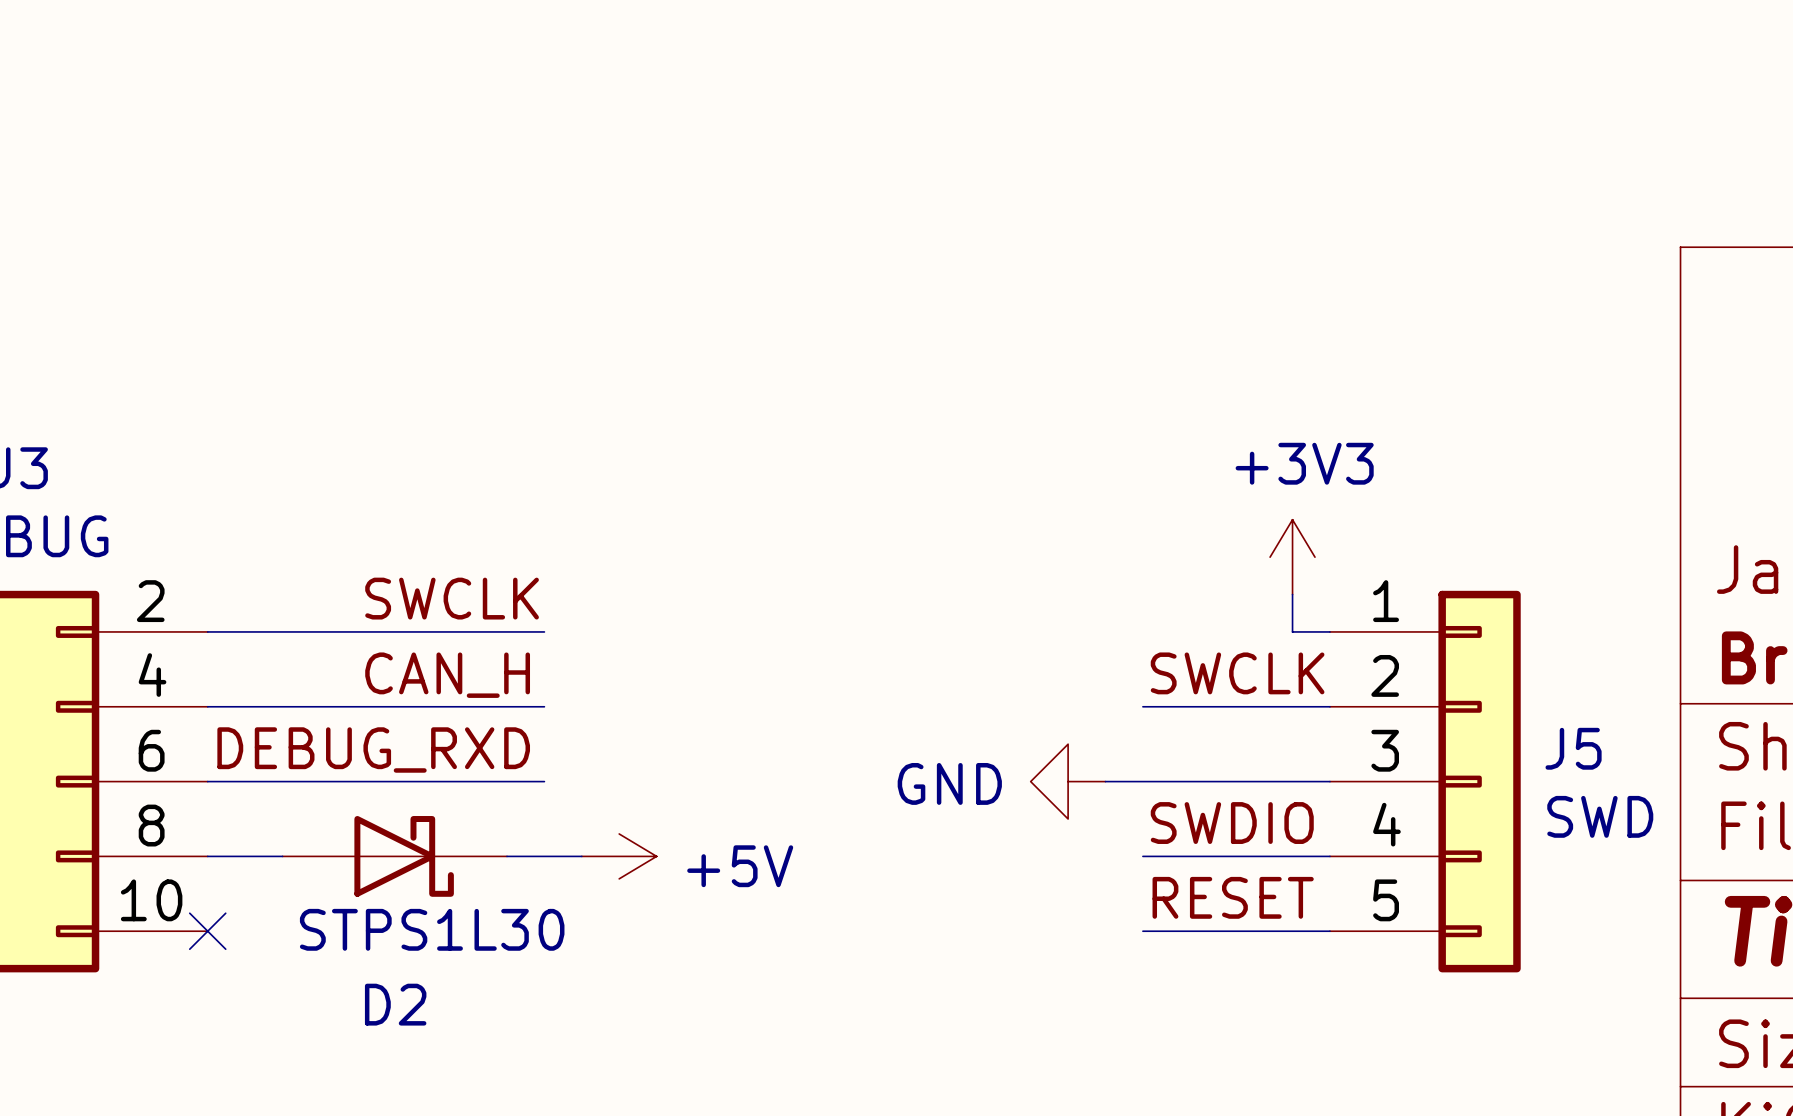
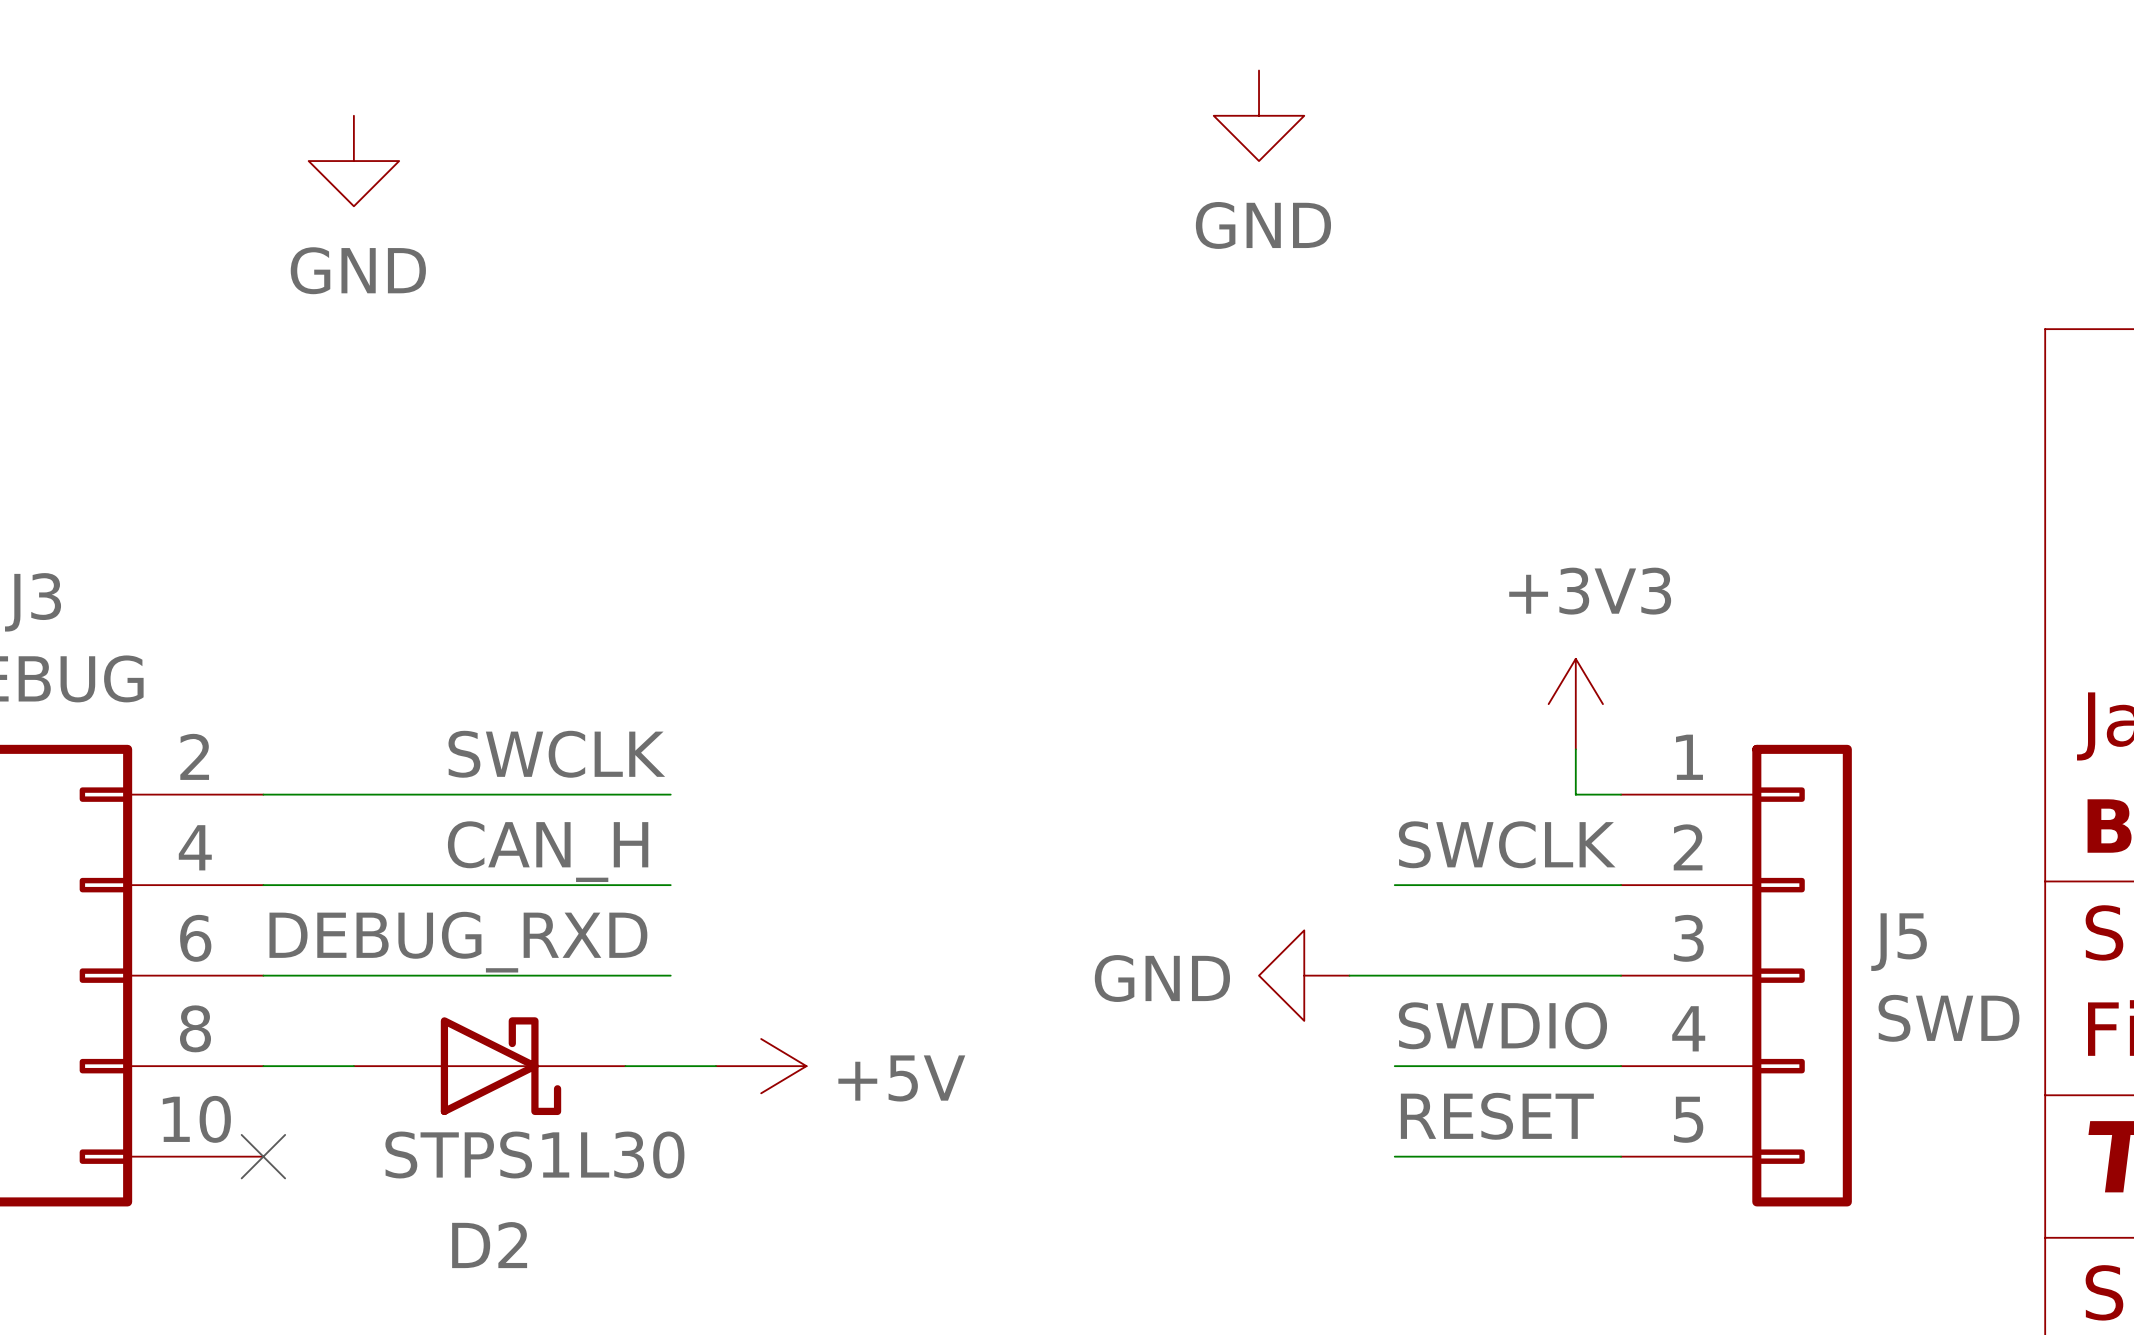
power symbol: none -> GND (1259, 115)
power symbol: none -> GND (353, 161)

